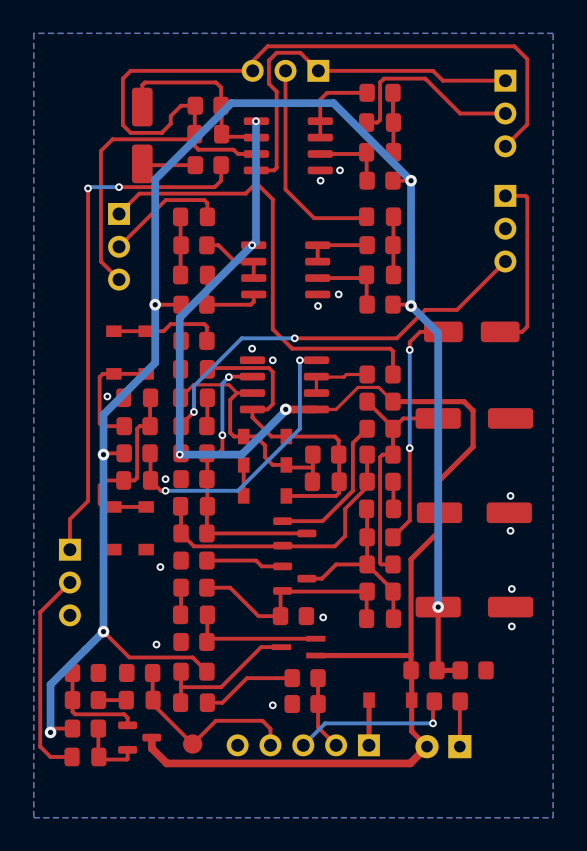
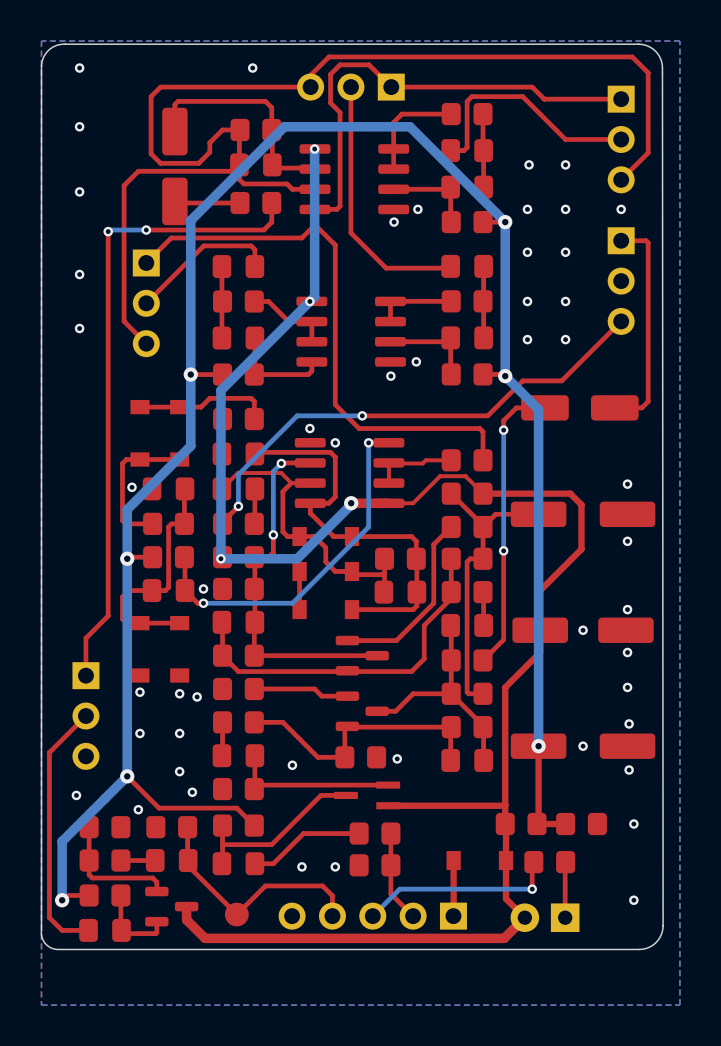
board edge: none -> (638, 44) (62, 44) (52, 47) (45, 54) (41, 66) (41, 932) (43, 940) (48, 946) (58, 949) (639, 949) (651, 946) (659, 937) (663, 925) (662, 68) (660, 58) (655, 51) (647, 46) (638, 44)
via: none -> (79, 68)
via: none -> (252, 68)
via: none -> (79, 126)
via: none -> (529, 164)
via: none -> (565, 164)
via: none -> (79, 191)
via: none -> (527, 209)
via: none -> (565, 209)
via: none -> (621, 209)
via: none -> (527, 252)
via: none -> (565, 252)
via: none -> (79, 274)
via: none -> (527, 301)
via: none -> (565, 301)
via: none -> (79, 328)
via: none -> (527, 339)
via: none -> (565, 339)
via: none -> (627, 484)
via: none -> (627, 541)
via: none -> (583, 630)
via: none -> (627, 687)
via: none -> (139, 692)
via: none -> (179, 693)
via: none -> (139, 733)
via: none -> (179, 733)
via: none -> (583, 746)
via: none -> (292, 765)
via: none -> (179, 771)
via: none -> (76, 795)
via: none -> (138, 809)
via: none -> (633, 824)
via: none -> (301, 866)
via: none -> (633, 900)

